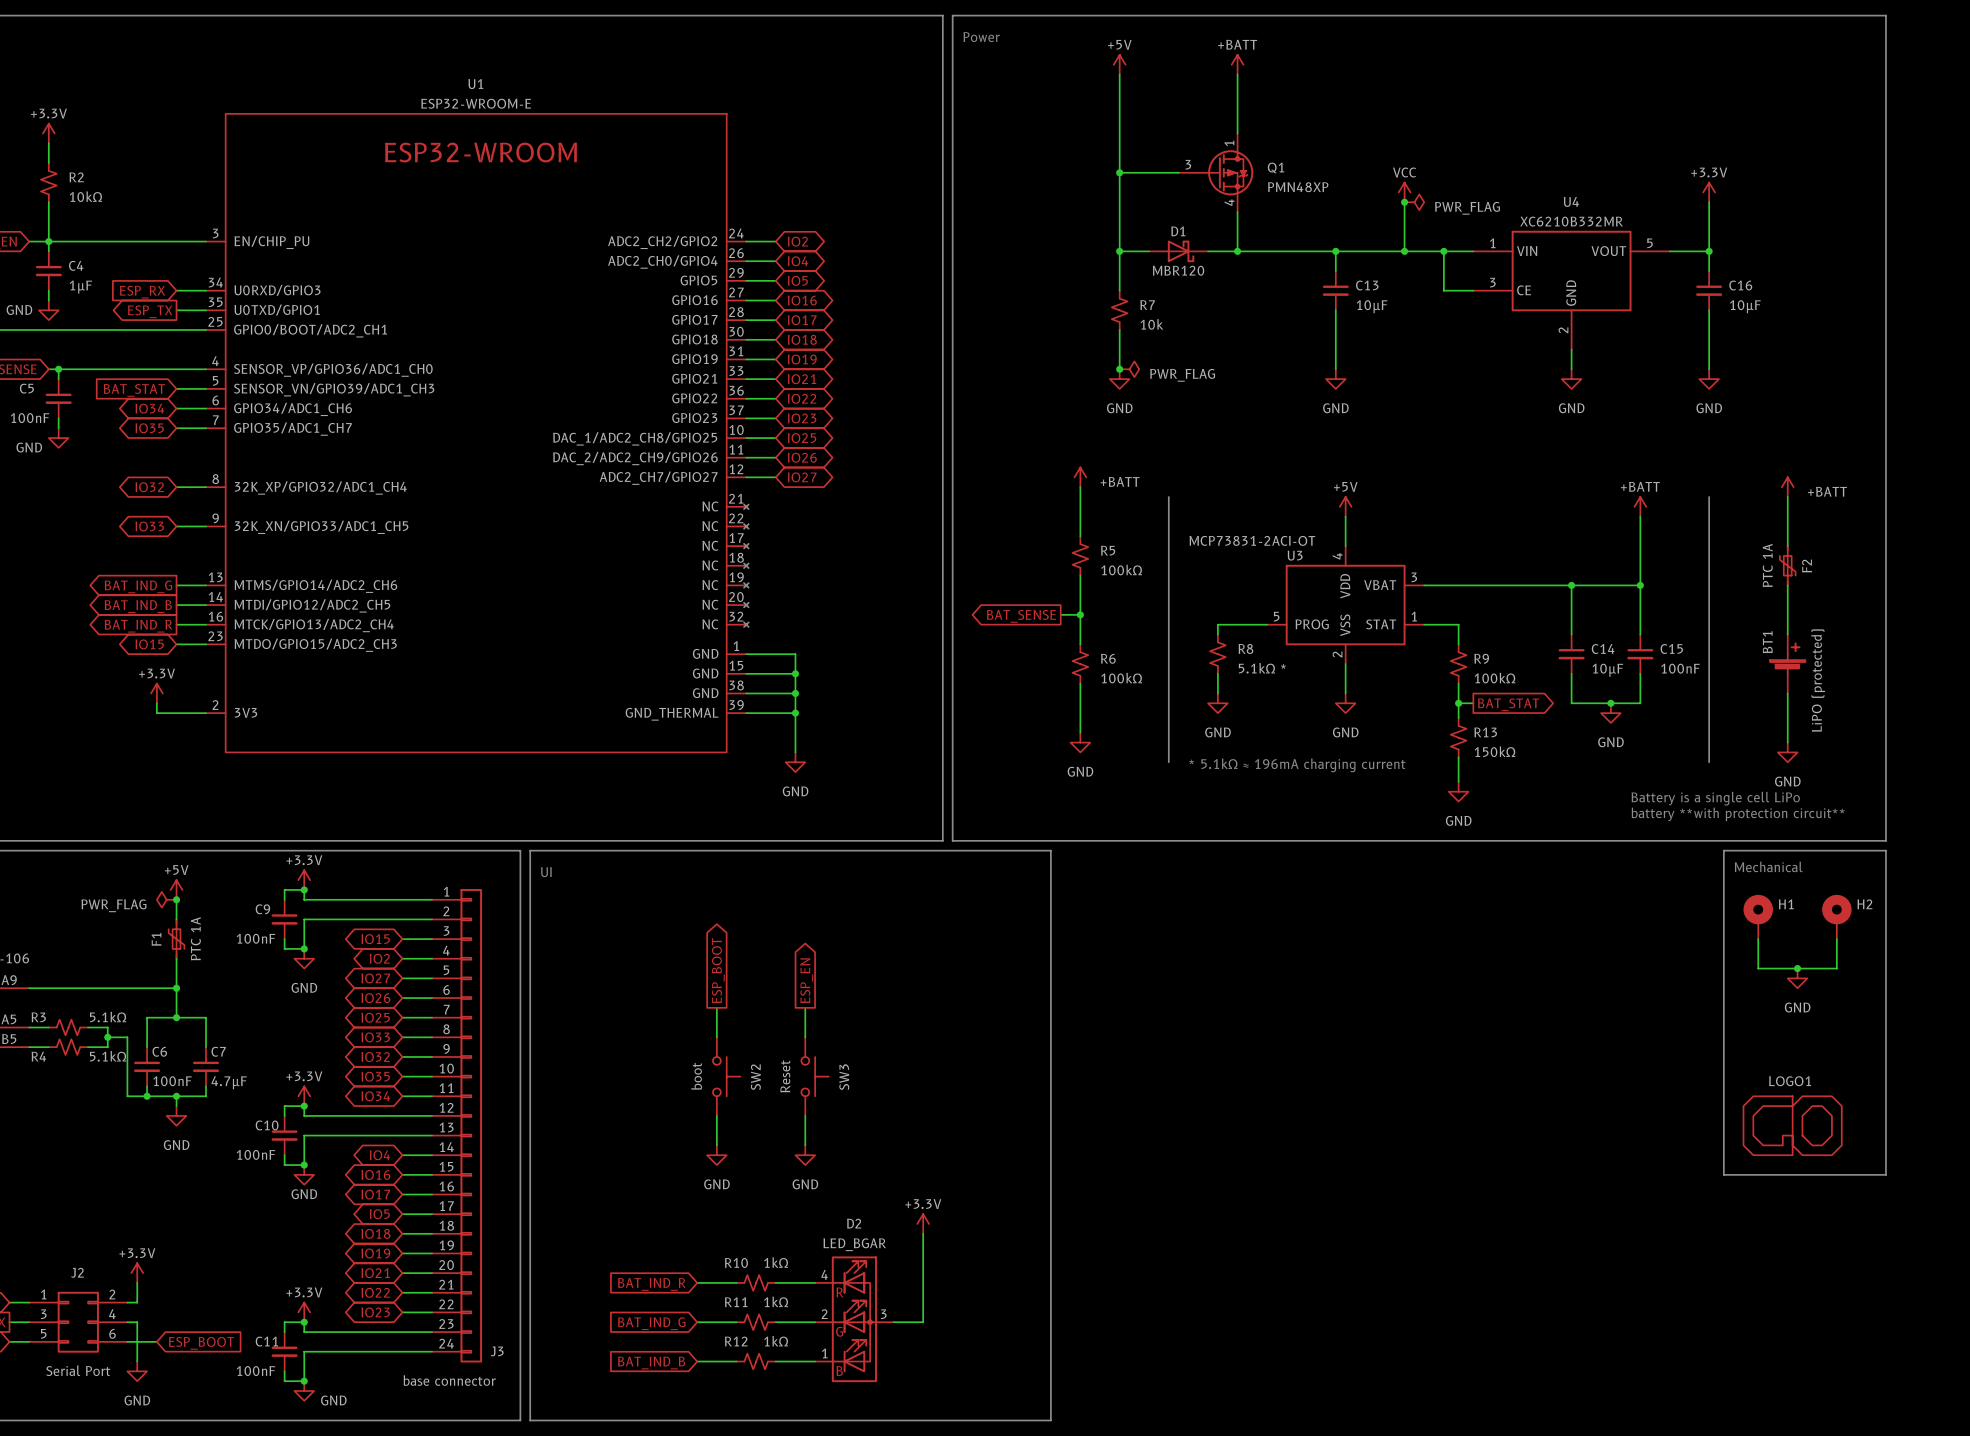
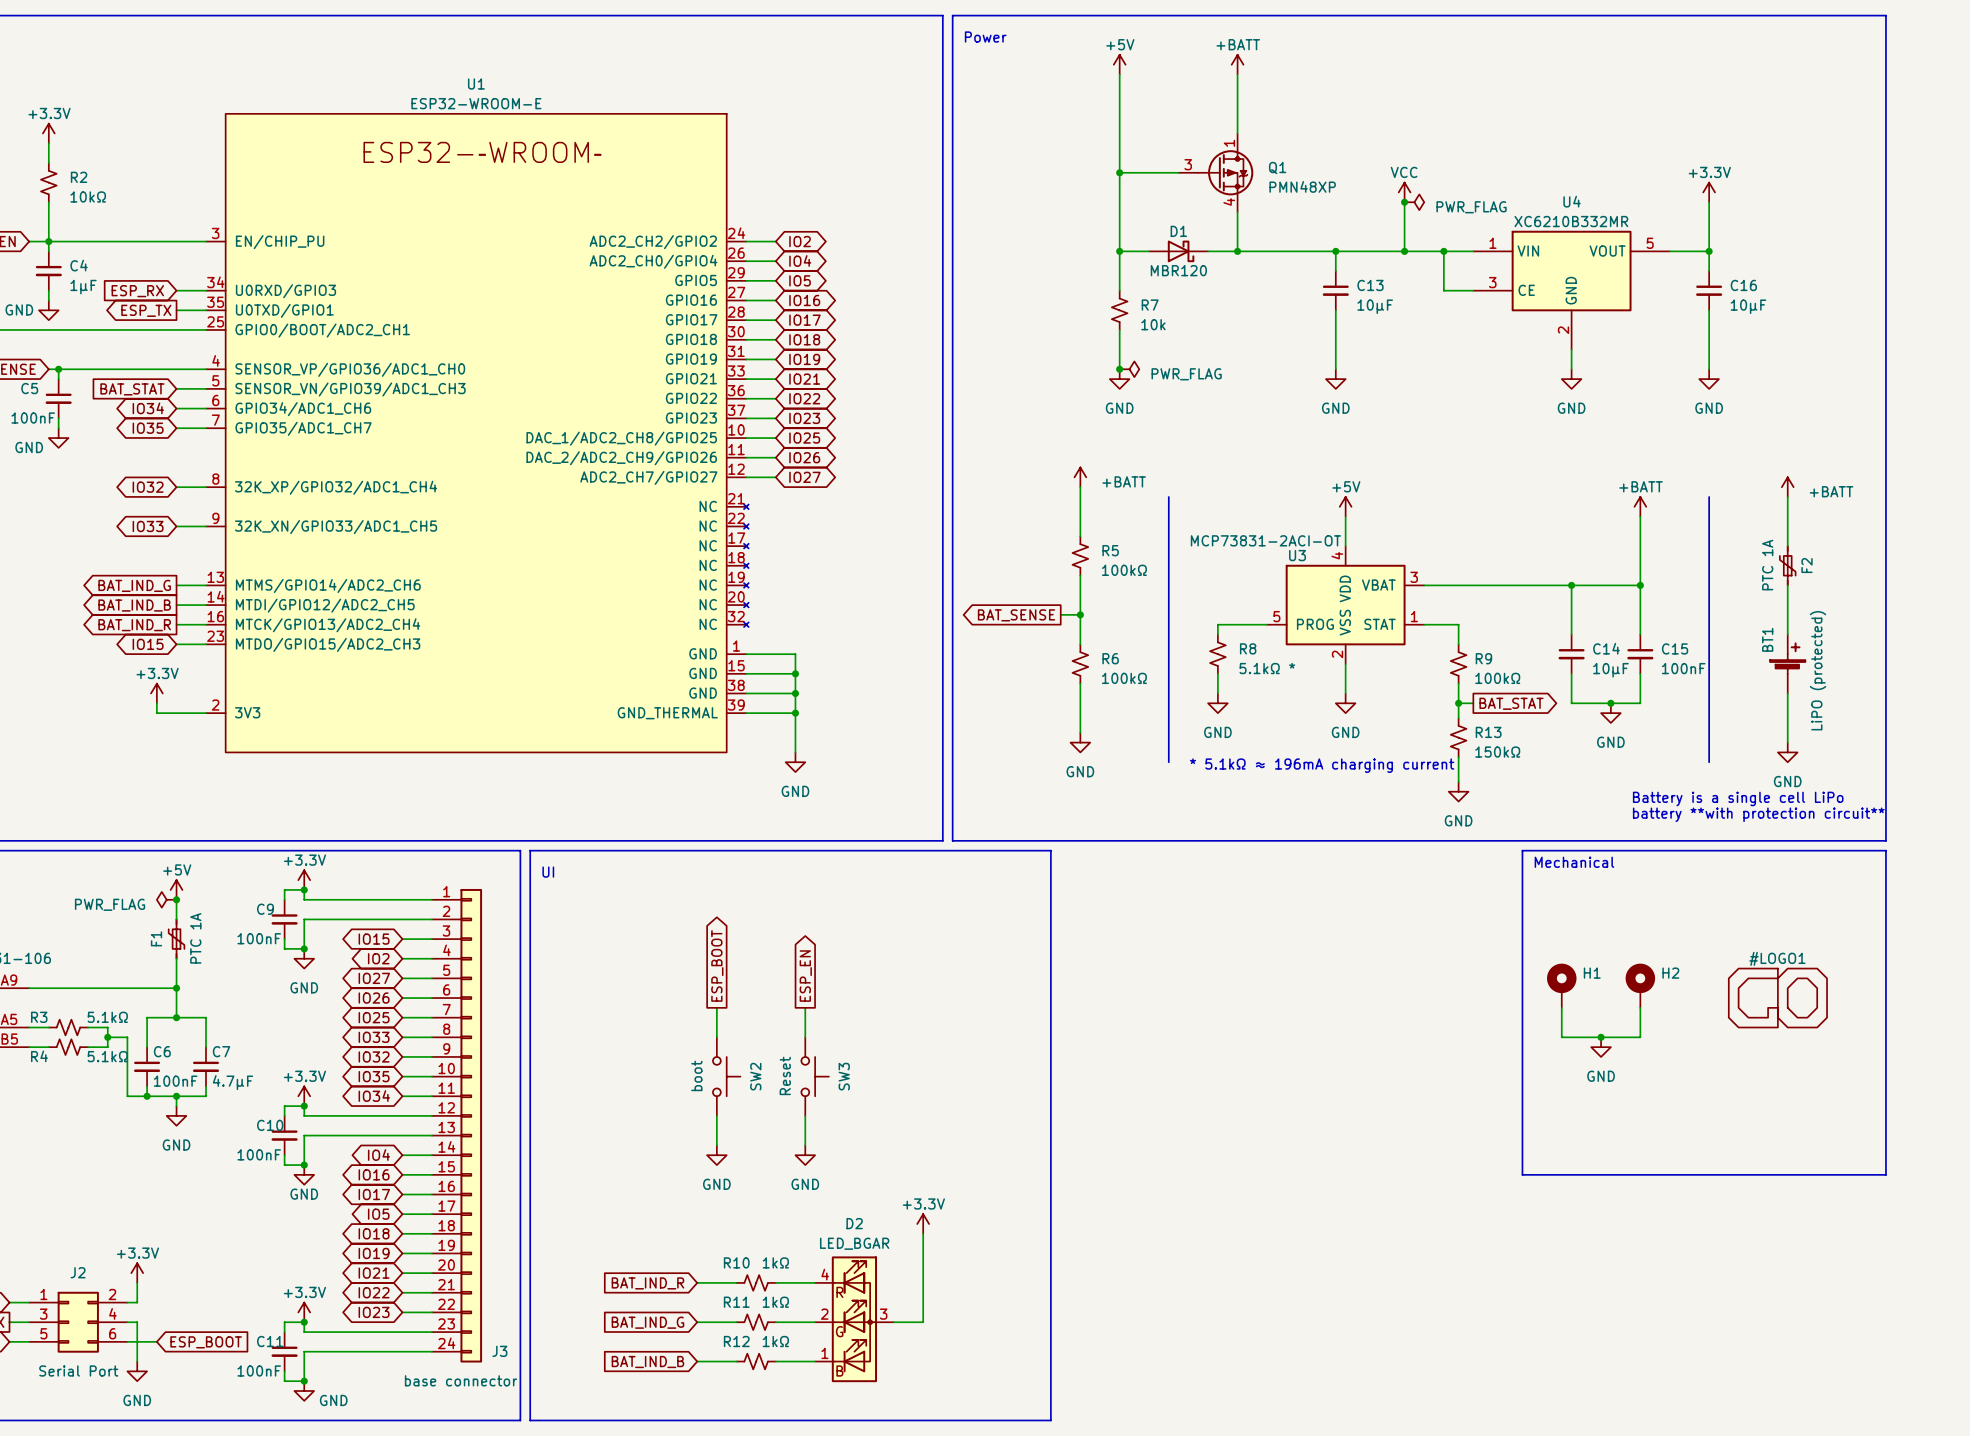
line: (1723, 850) (1723, 1174) -> (1723, 850) (1522, 850) (1522, 1174) (1723, 1174)
text: none -> Mechanical (1574, 862)
text: Mechanical (1768, 866) -> none
H1 position: (1758, 916) -> (1561, 985)
H2 position: (1836, 916) -> (1640, 985)
wire: (1758, 939) (1758, 968) (1836, 968) (1836, 939) -> none
junction: (1797, 968) -> none
power symbol: GND (1797, 978) -> none
#LOGO1: none -> (1777, 998)
wire: none -> (1561, 1007) (1561, 1037) (1640, 1037) (1640, 1007)
junction: none -> (1601, 1037)
power symbol: none -> GND (1601, 1047)
LOGO1: (1792, 1125) -> none

